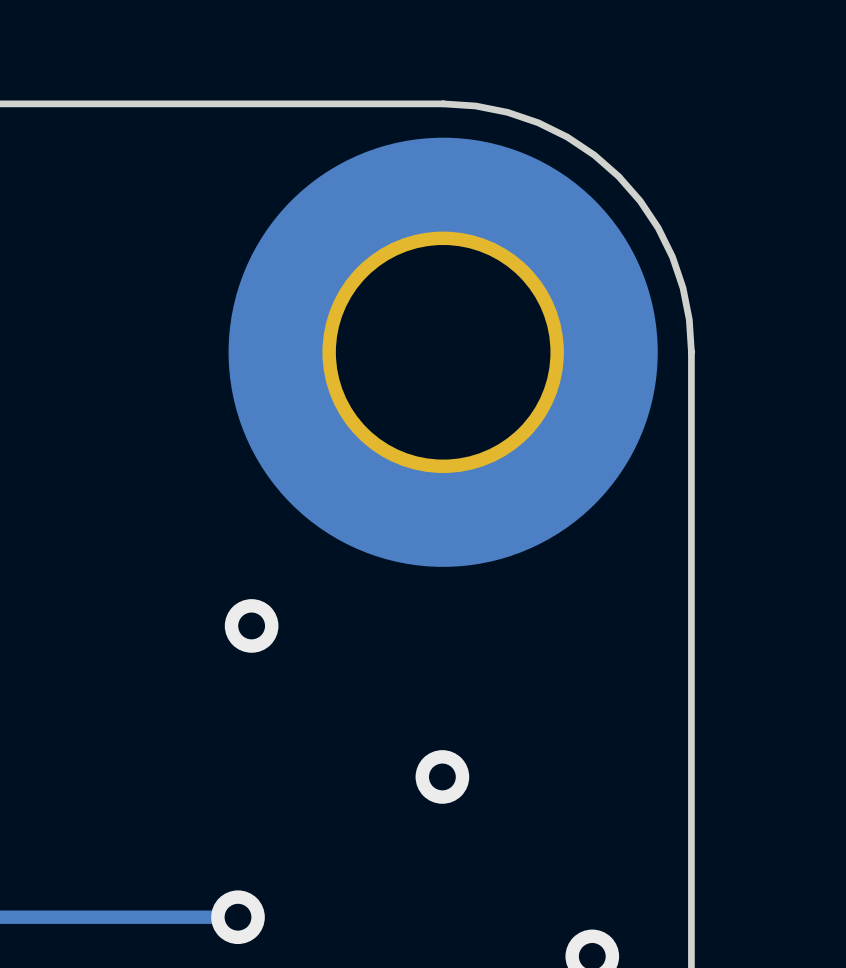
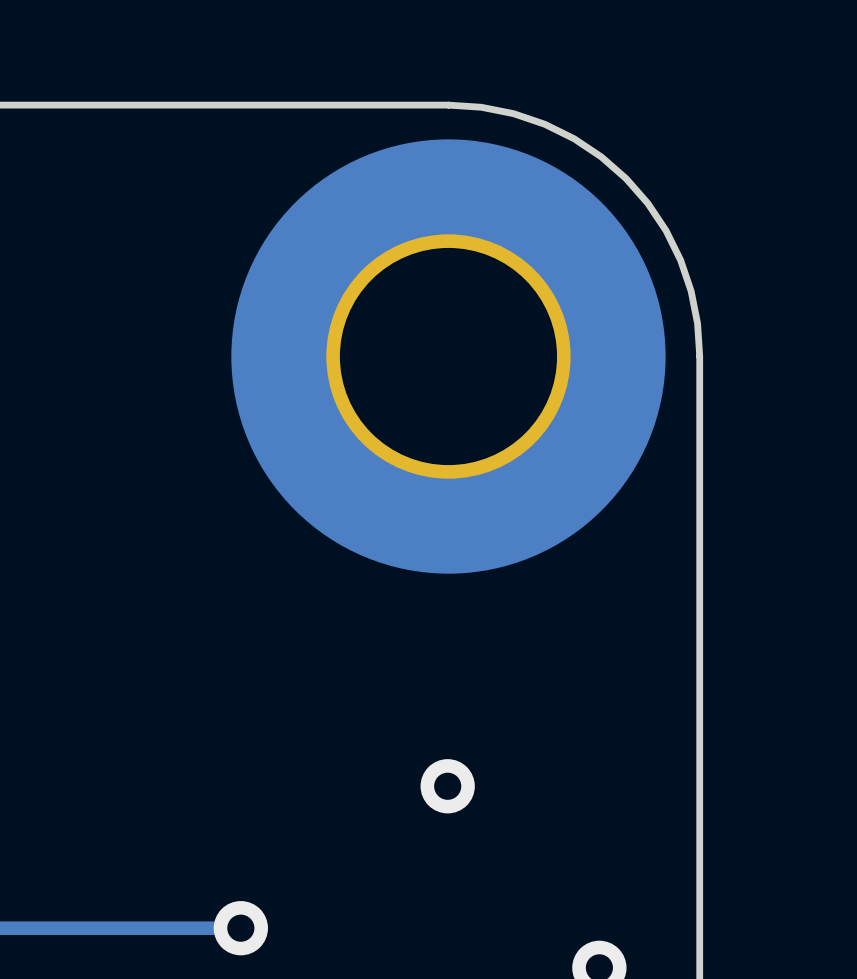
via: (251, 625) -> none

